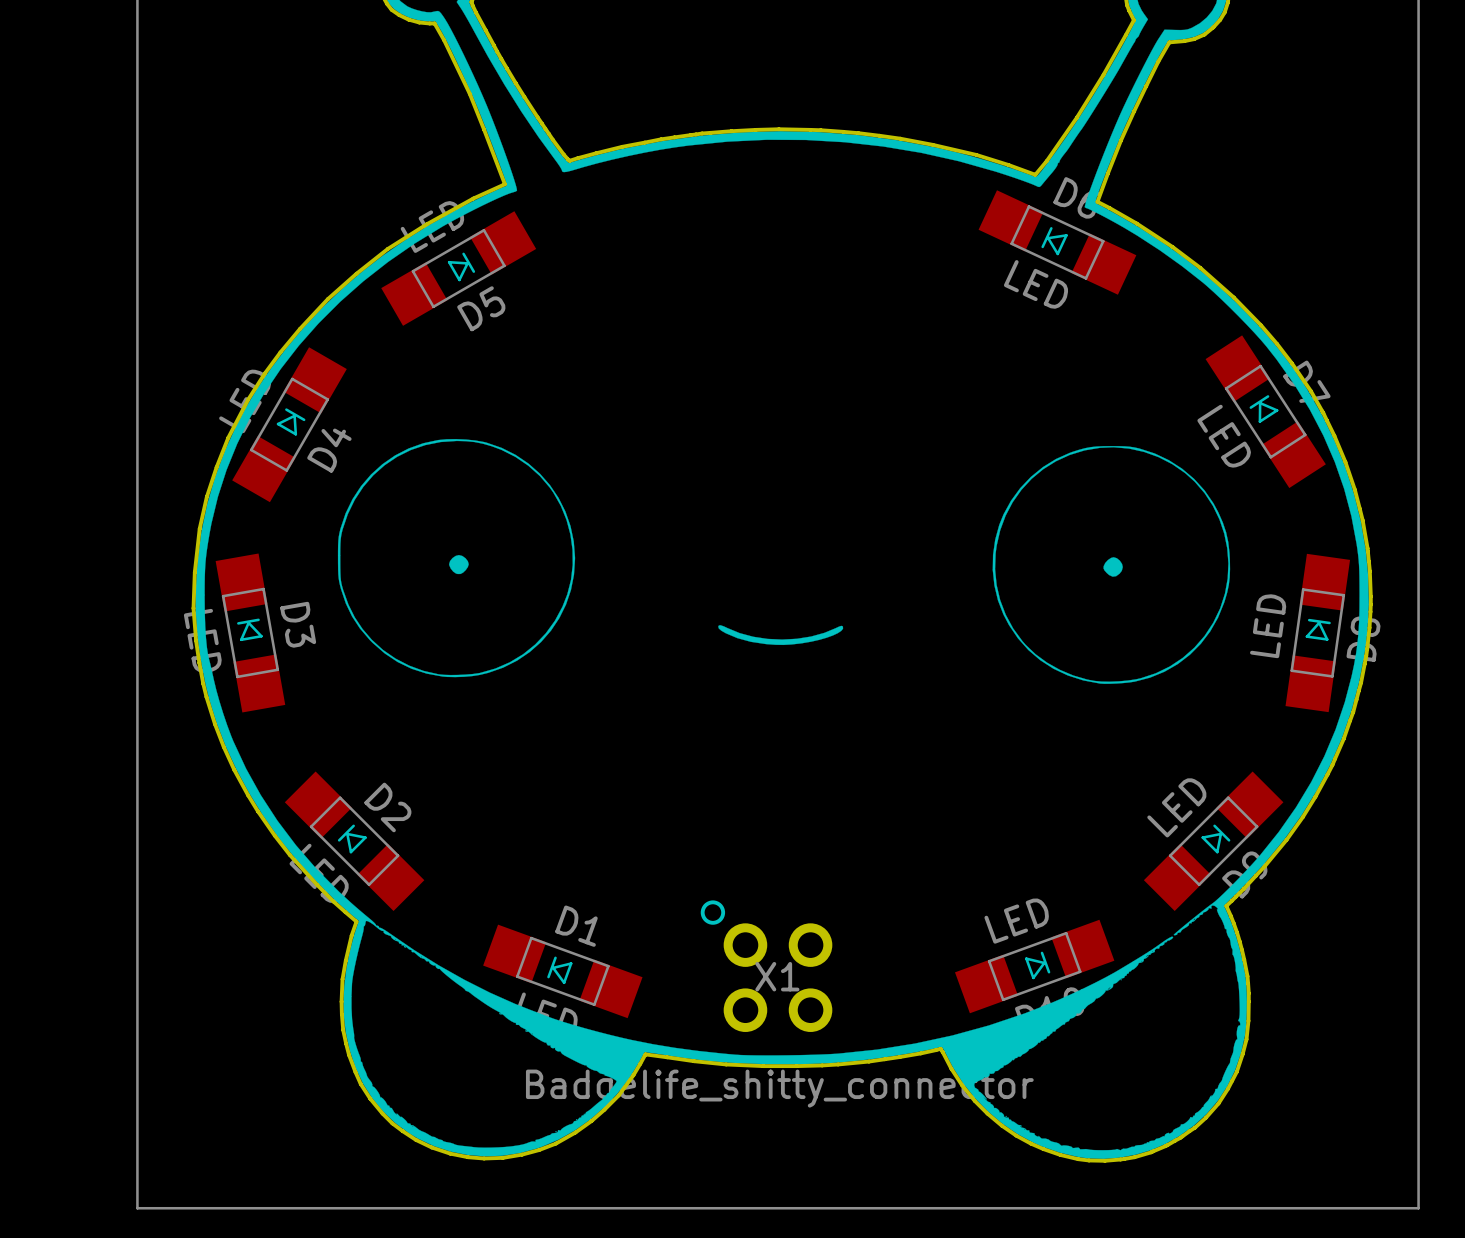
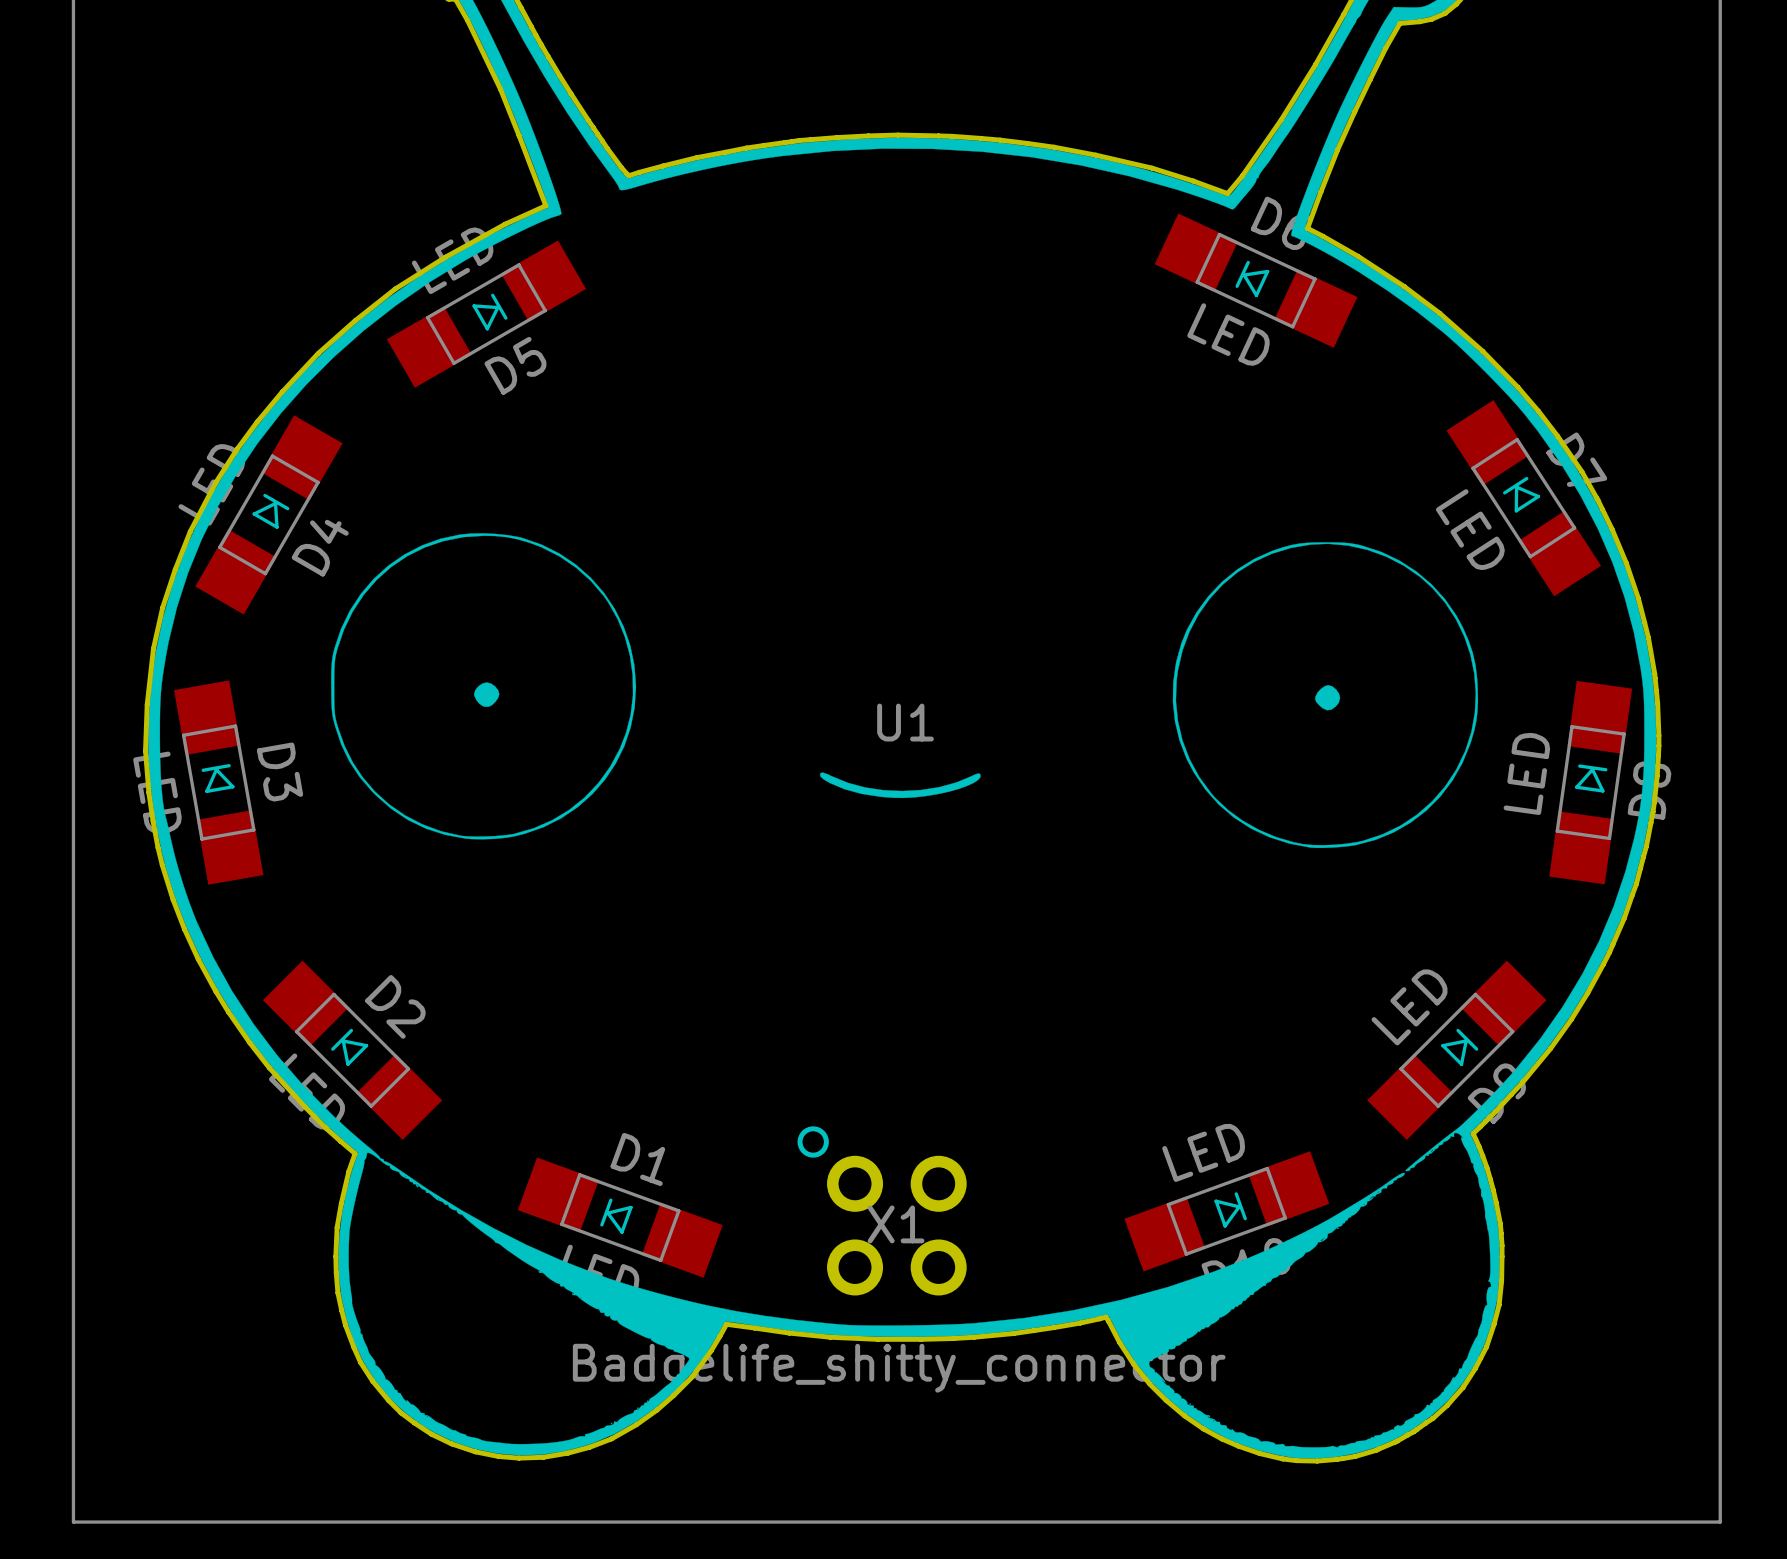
U1: none -> (905, 722)

